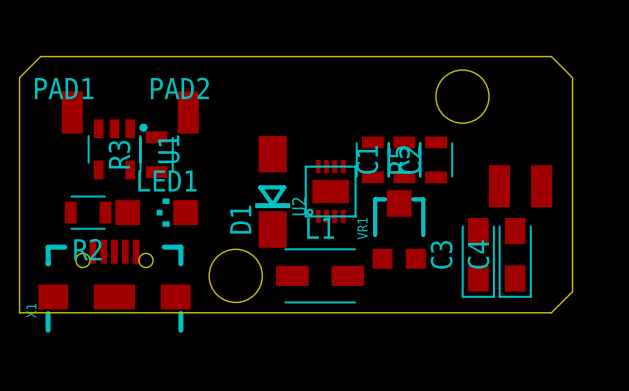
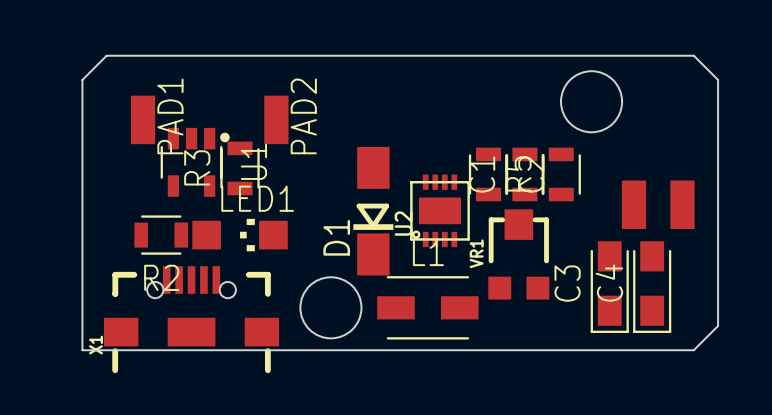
PAD1 name rotation: 0° (64, 88) -> 90° counterclockwise (170, 116)
PAD2 name rotation: 0° (179, 88) -> 90° counterclockwise (303, 116)

